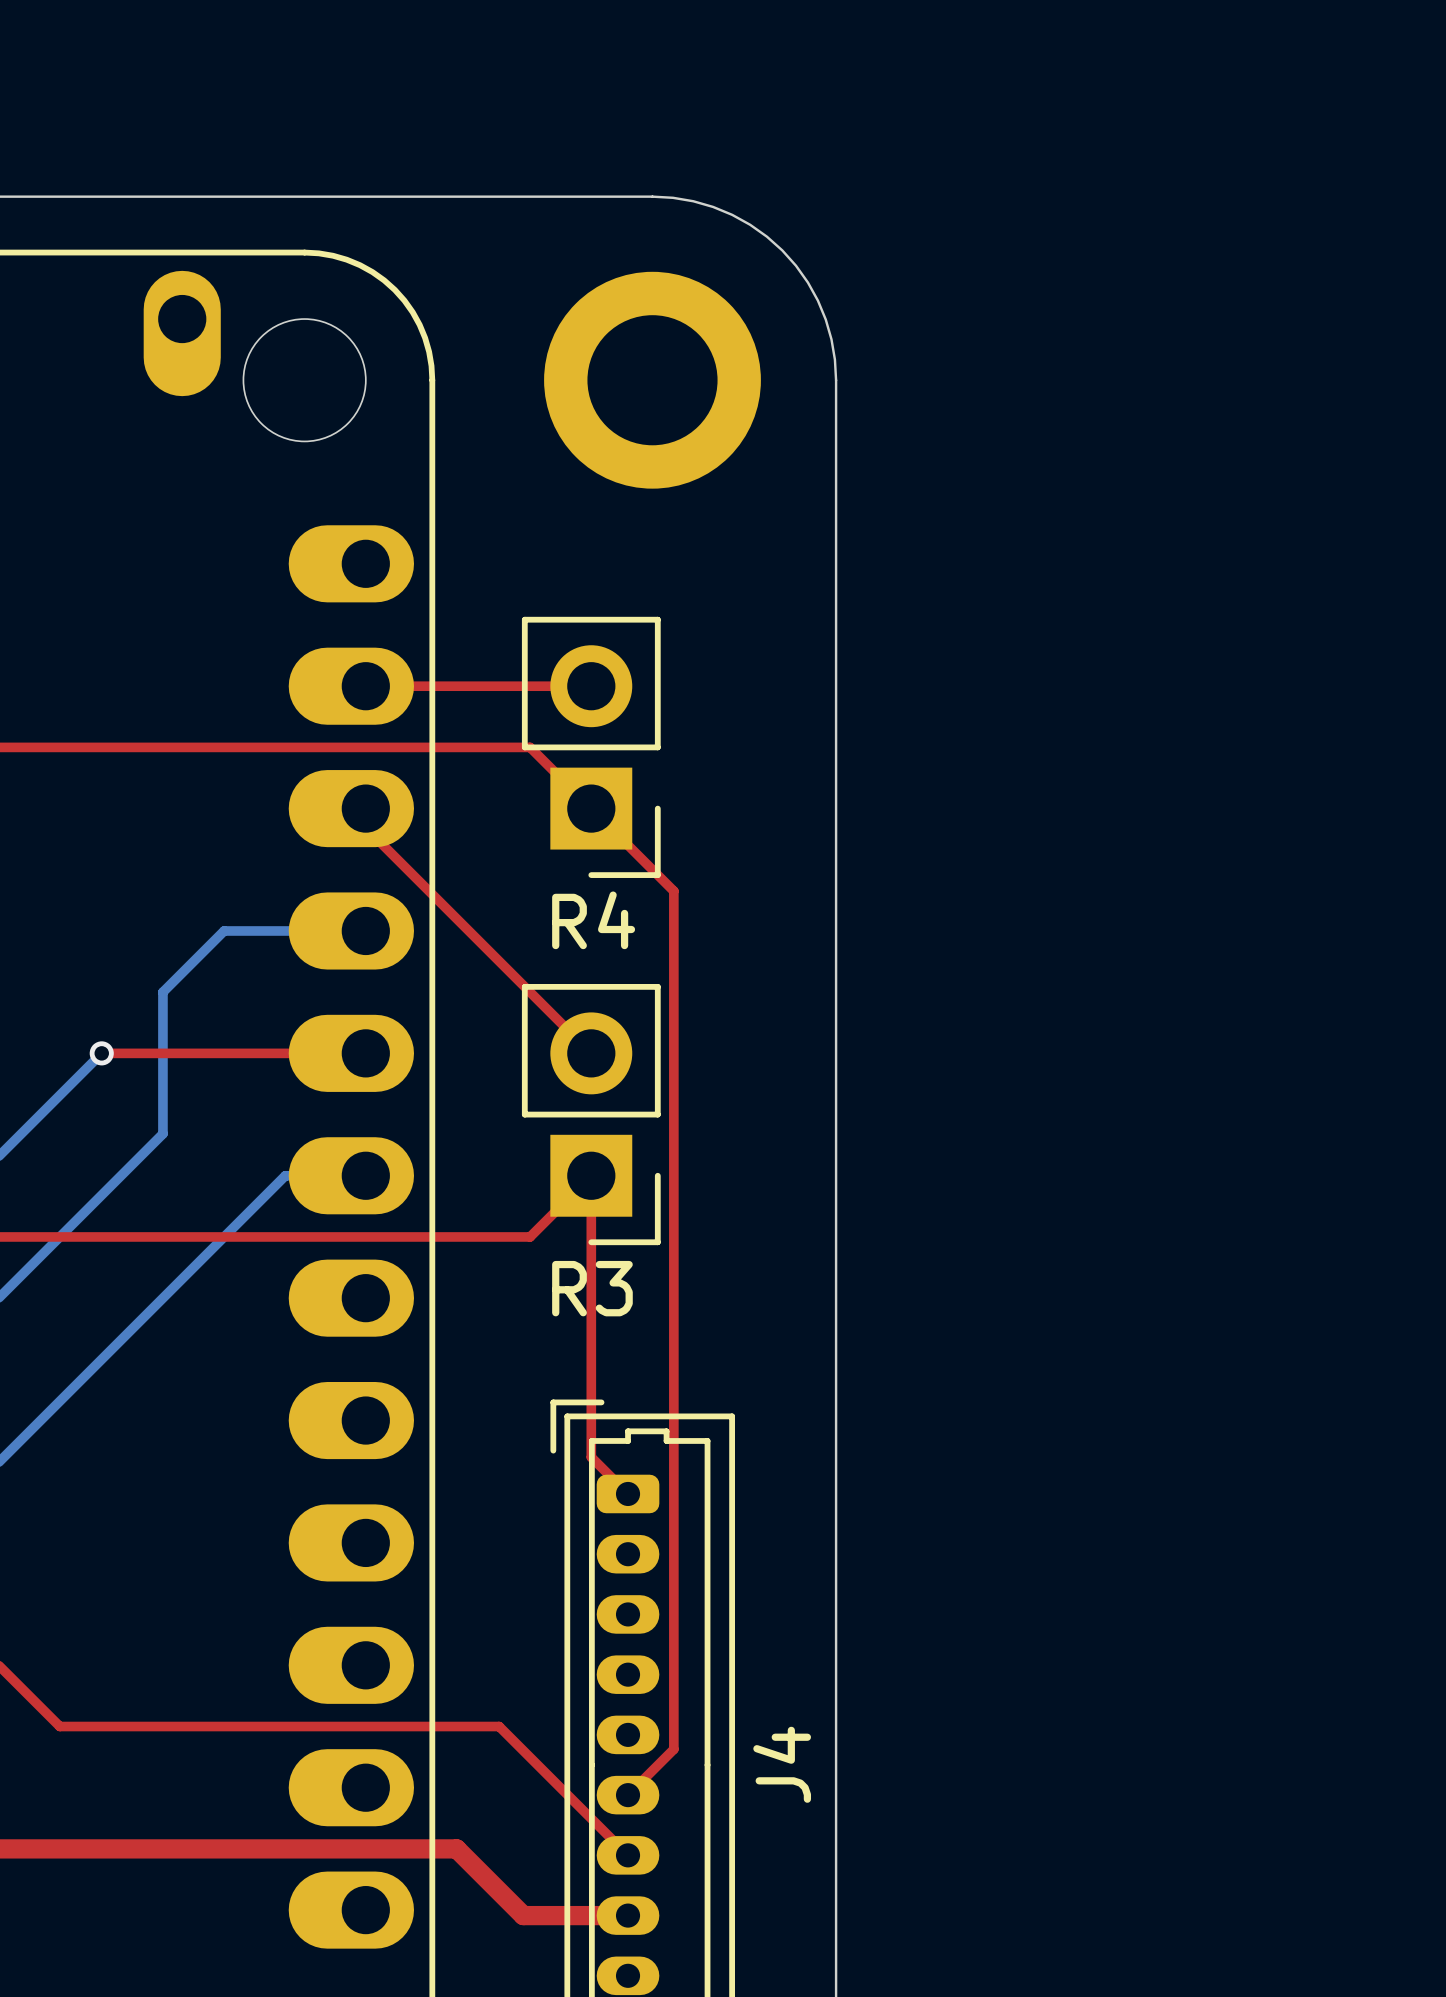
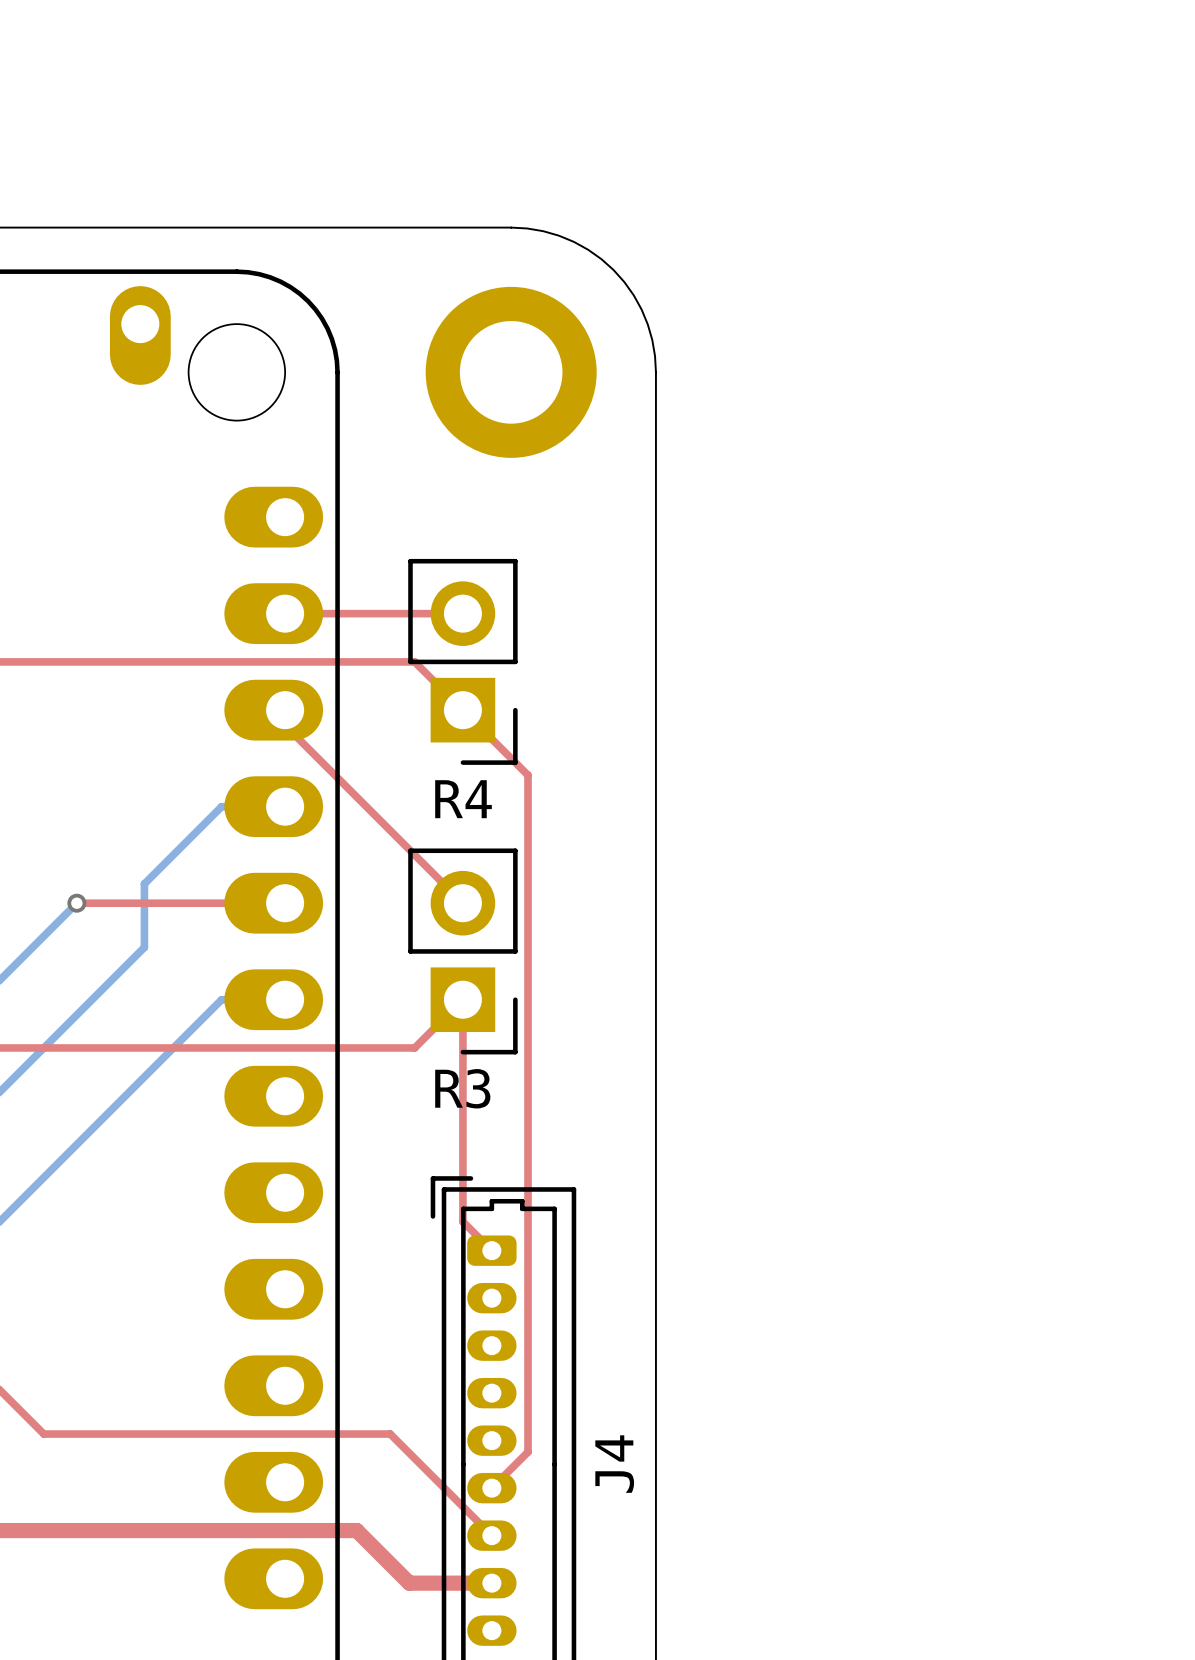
bottom track: (285, 930) (224, 930) (162, 992) (162, 1133) -> (221, 806) (144, 883) (144, 947) (125, 966)

